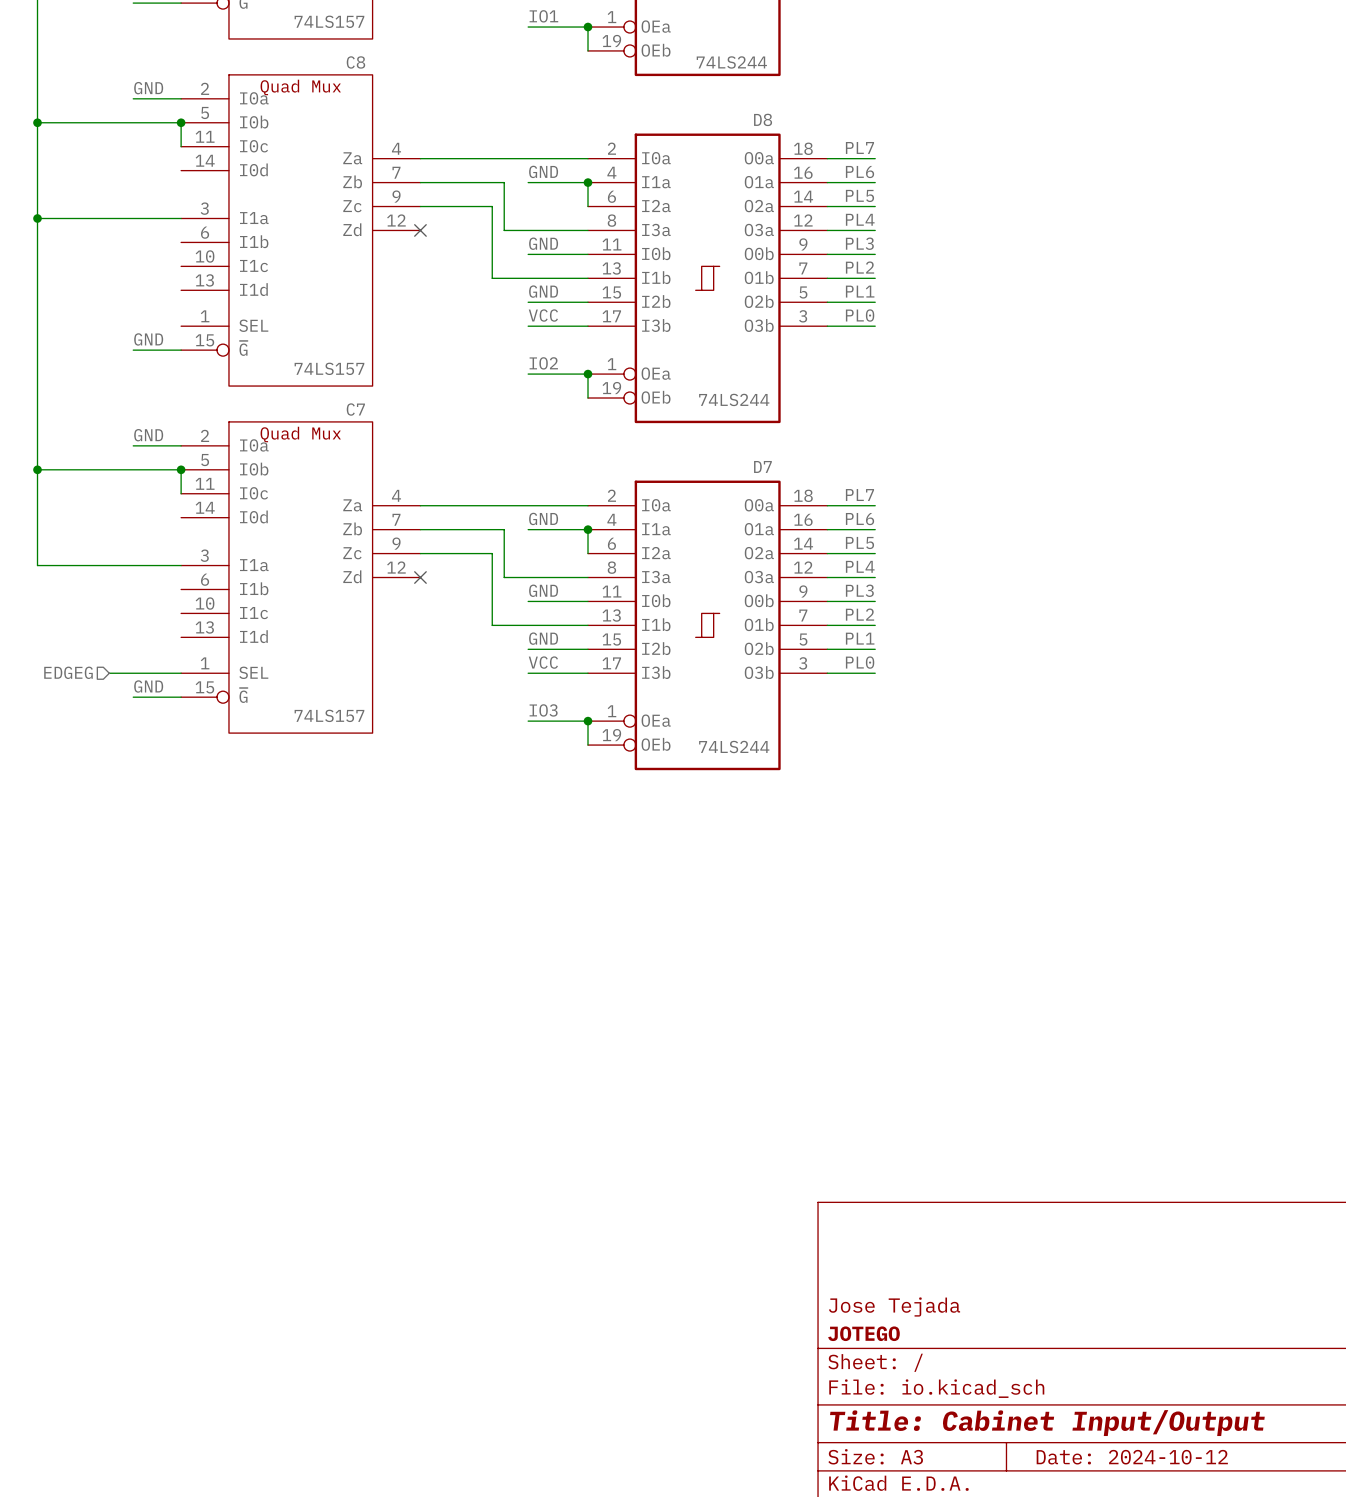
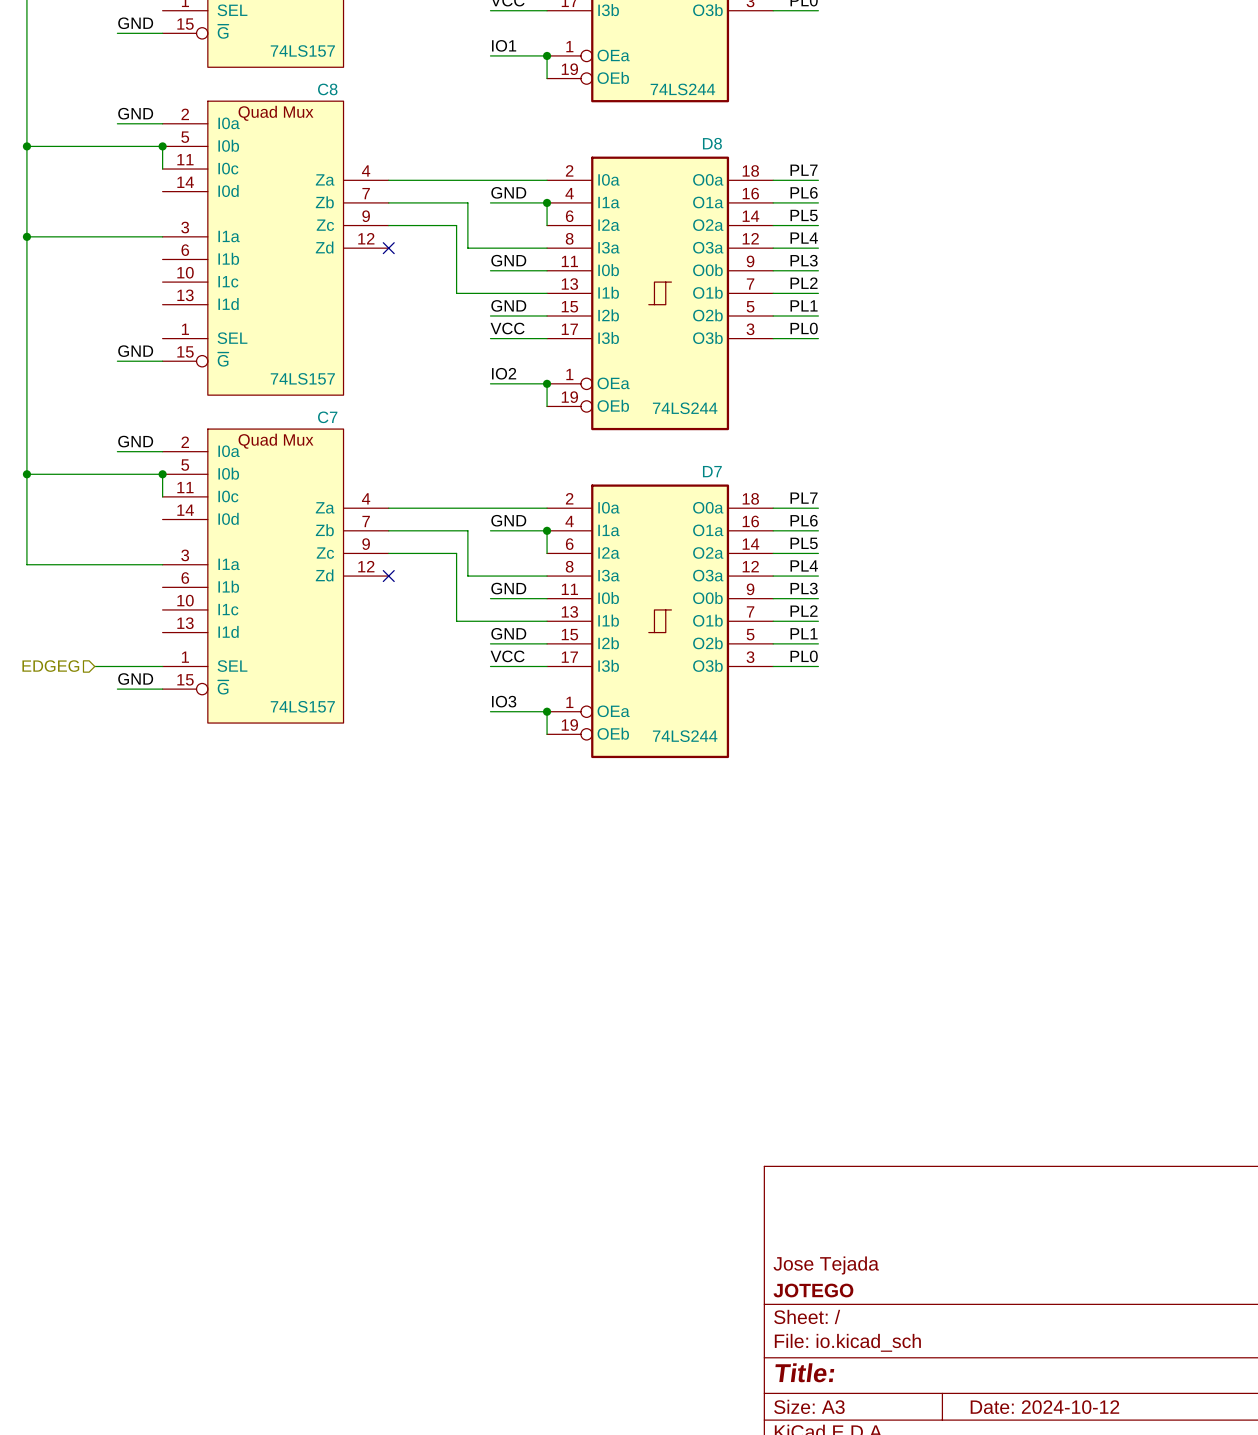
title block: Title: Cabinet Input/Output (1047, 1423) -> Title: (804, 1372)

